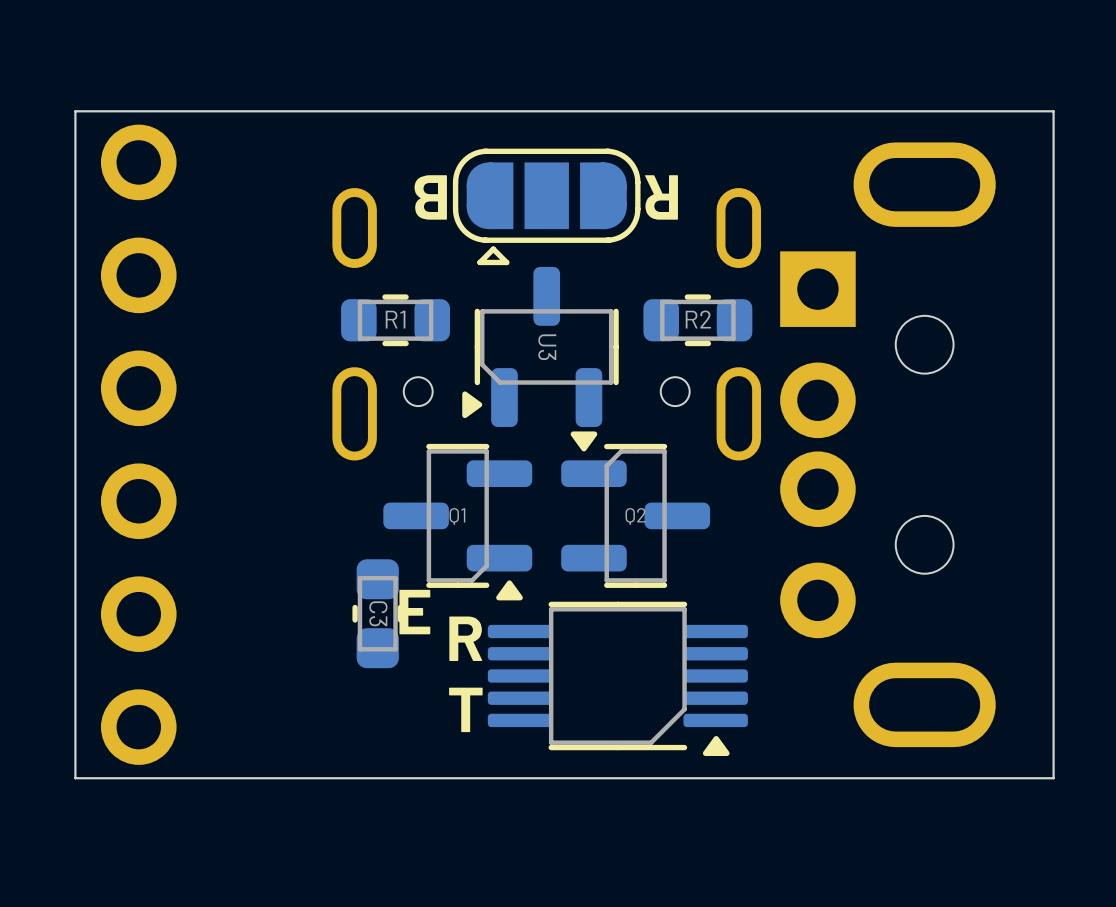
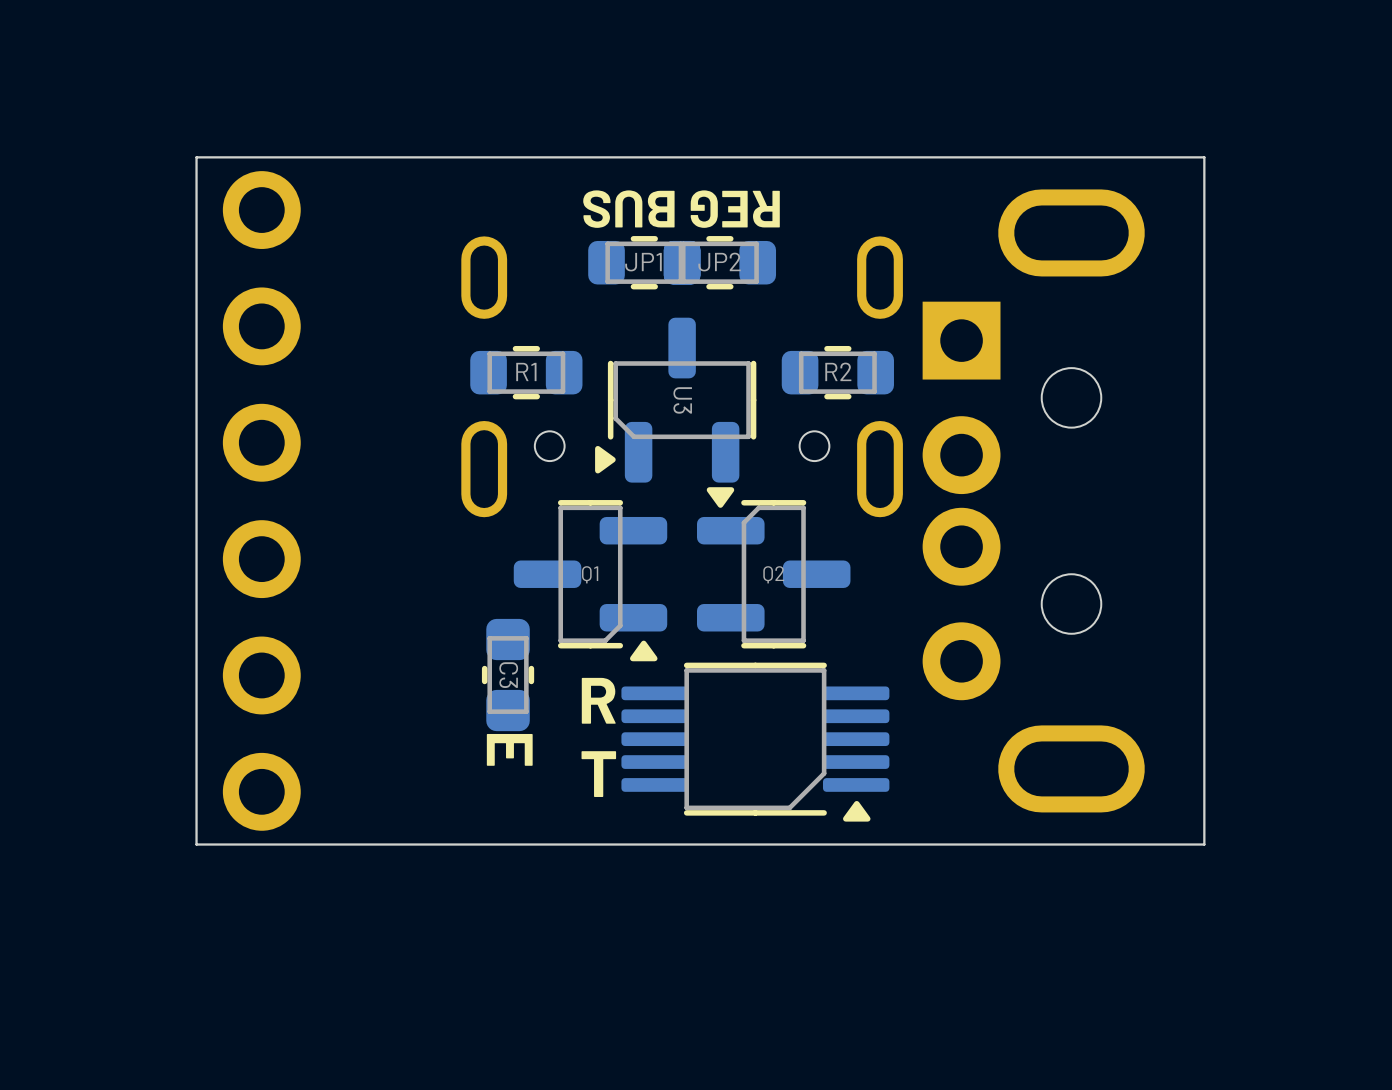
text: none -> REG BUS (681, 209)
text: B (430, 197) -> none
text: R (661, 197) -> none
part: (546, 206) -> none
JP1: none -> (644, 262)
JP2: none -> (719, 262)
text rotation: 0° (414, 612) -> 90° clockwise (509, 749)
text position: E (414, 612) -> E (509, 749)

